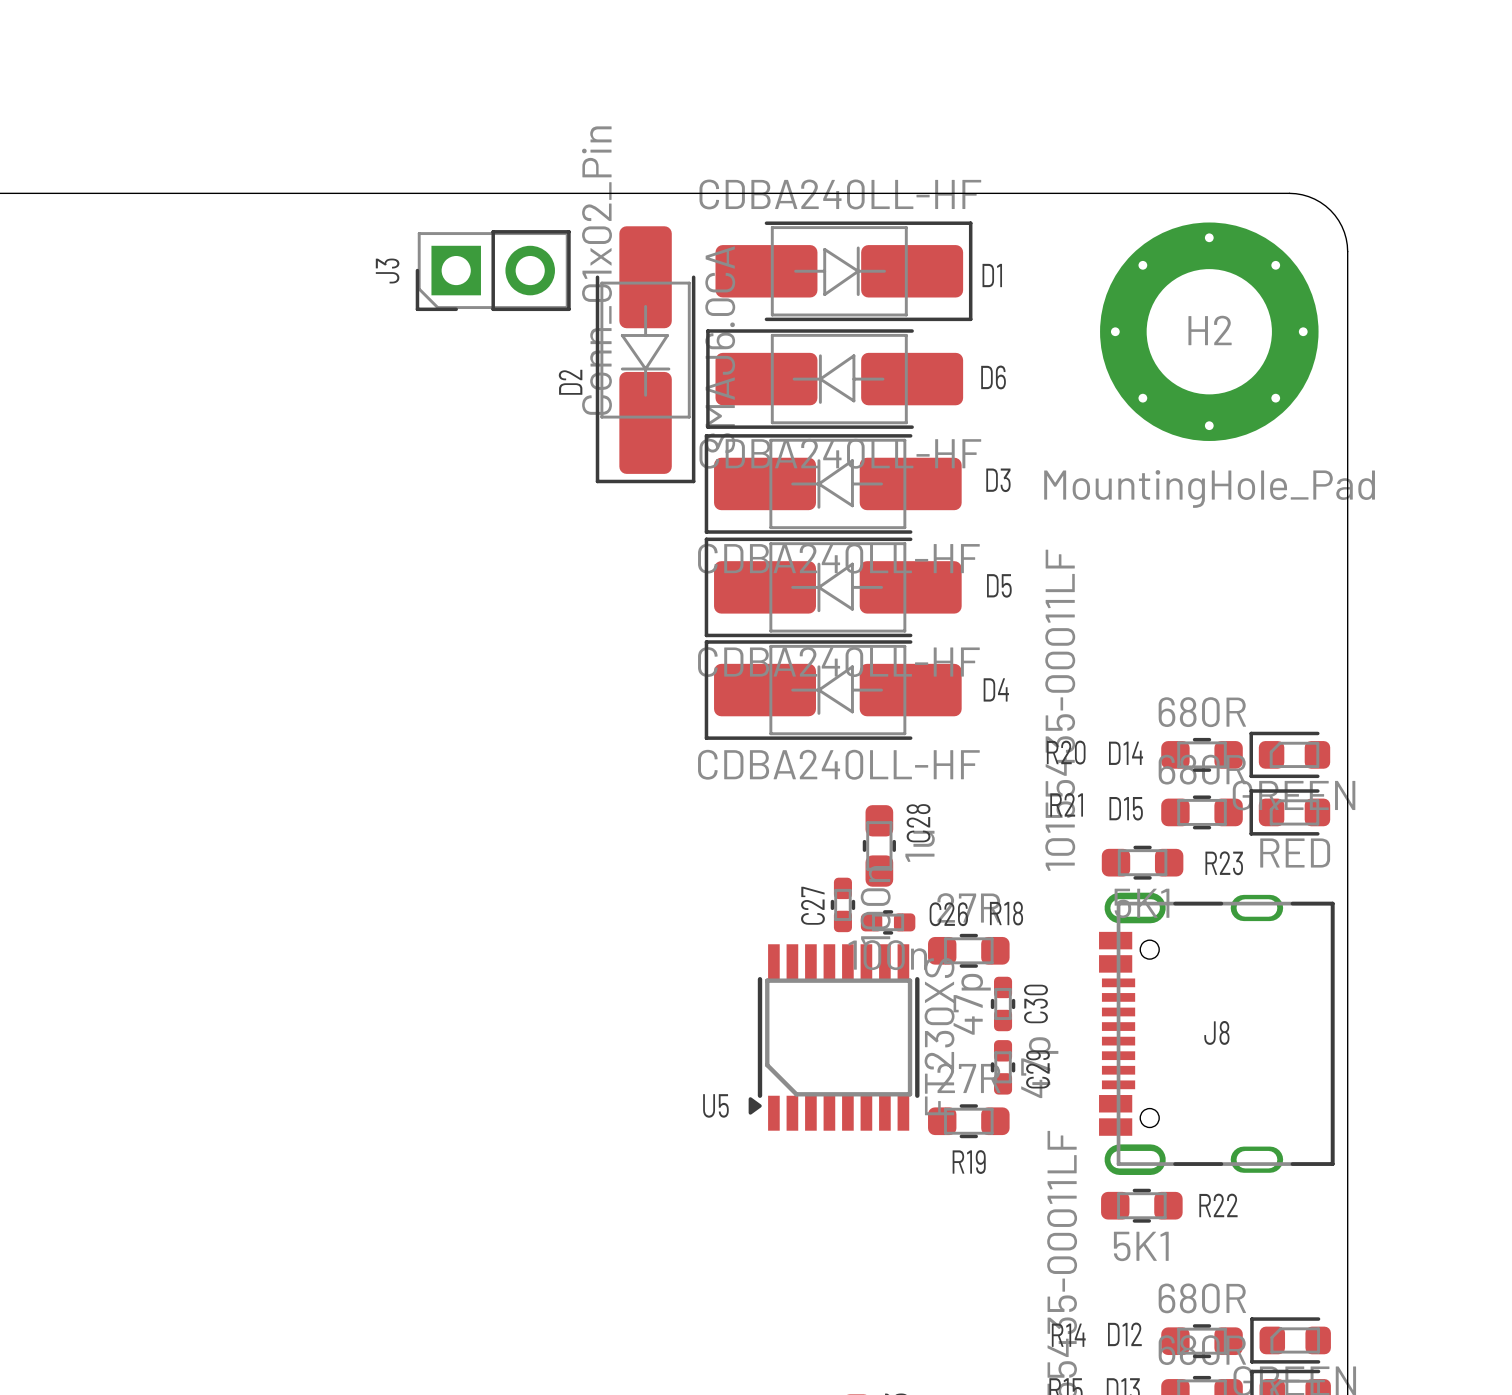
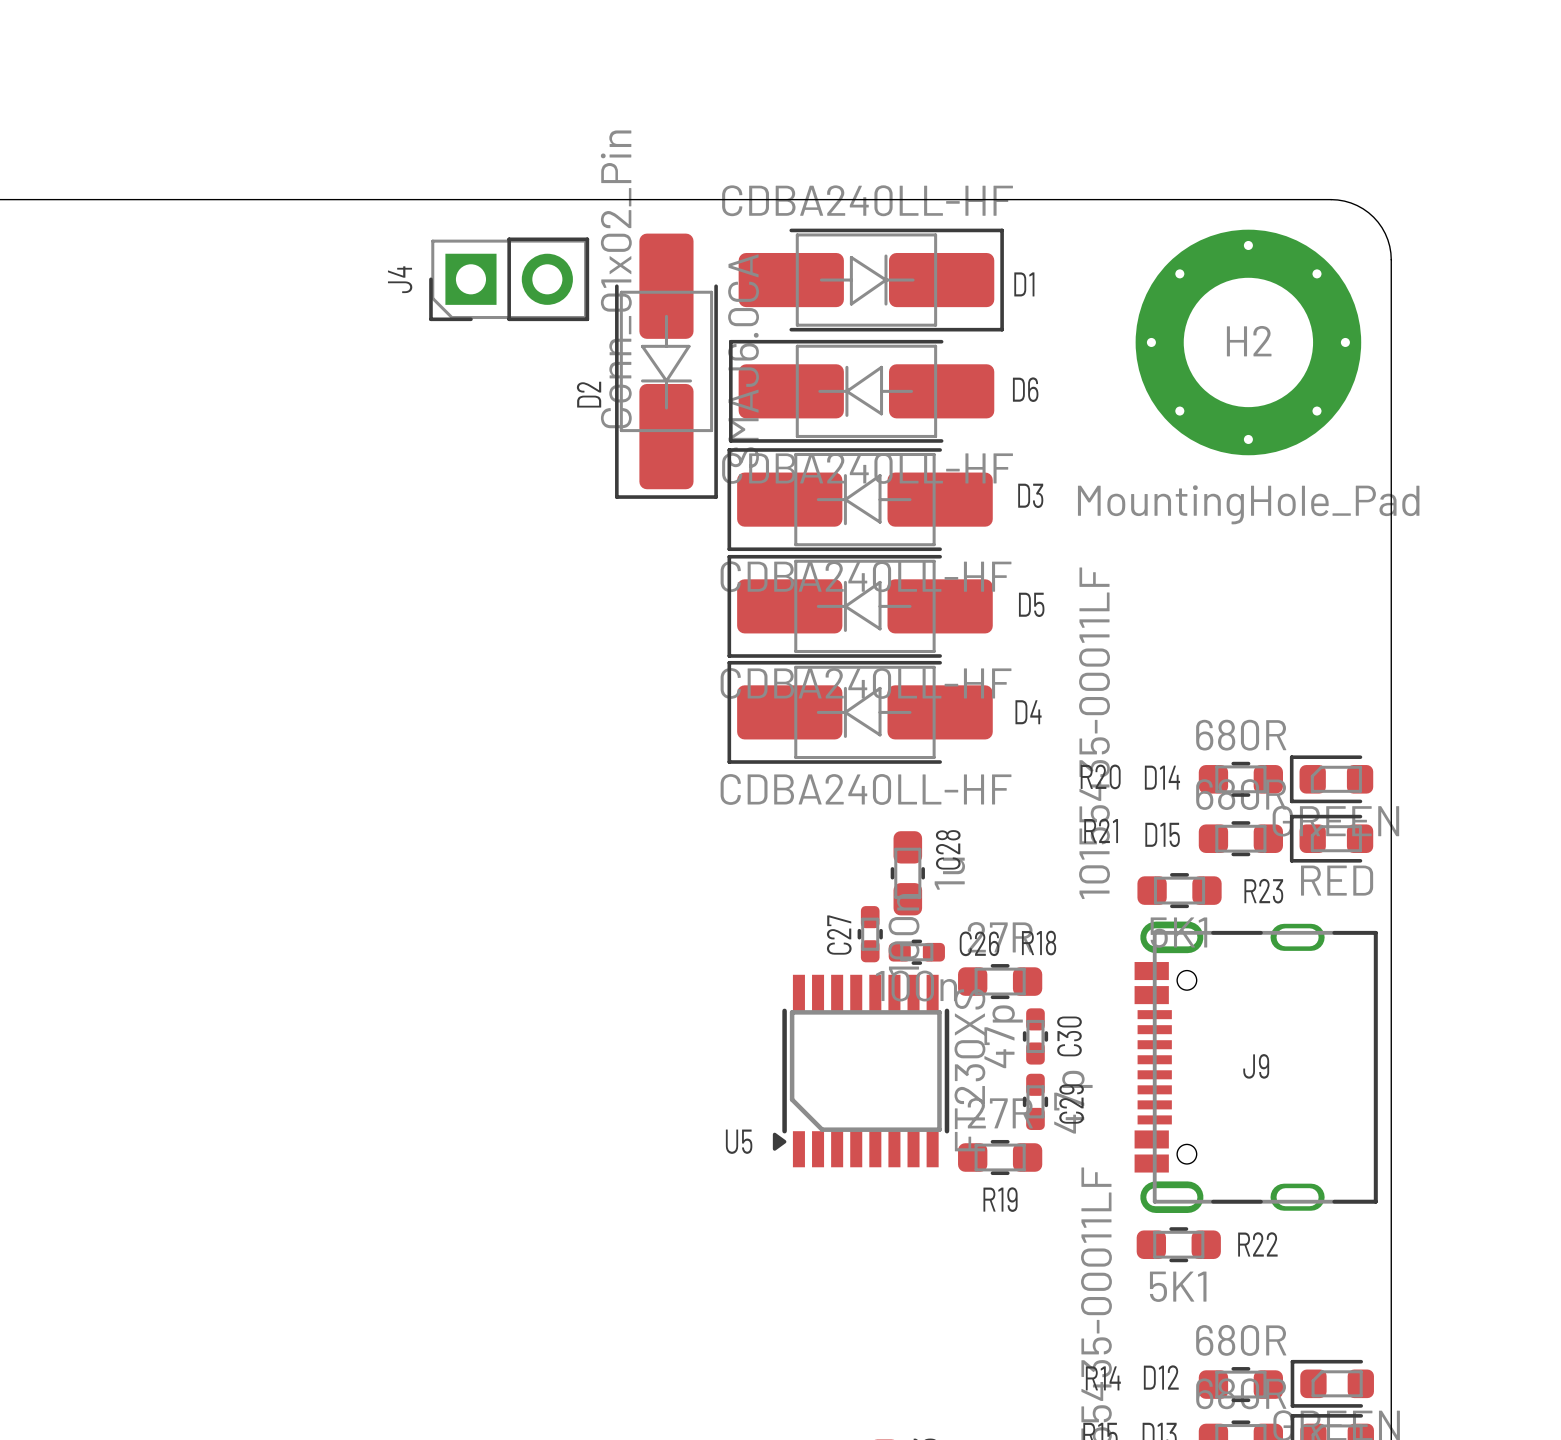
J3 name: J3 (387, 271) -> J4 (400, 279)
J8 name: J8 (1216, 1032) -> J9 (1256, 1066)

